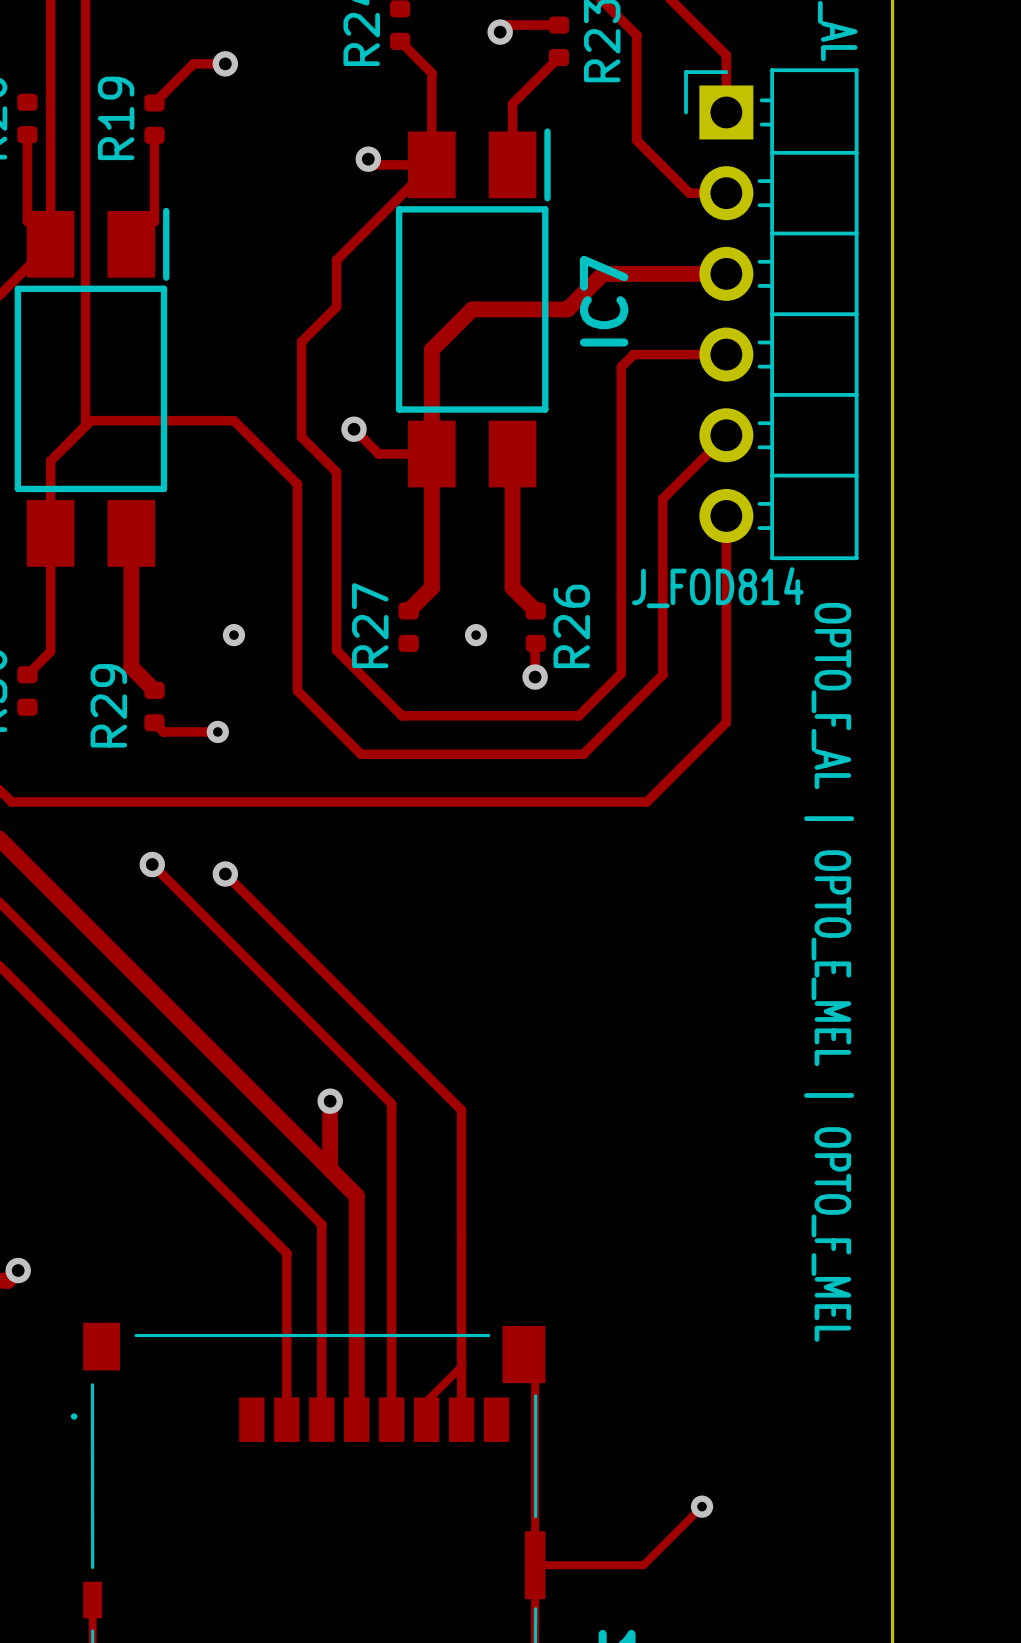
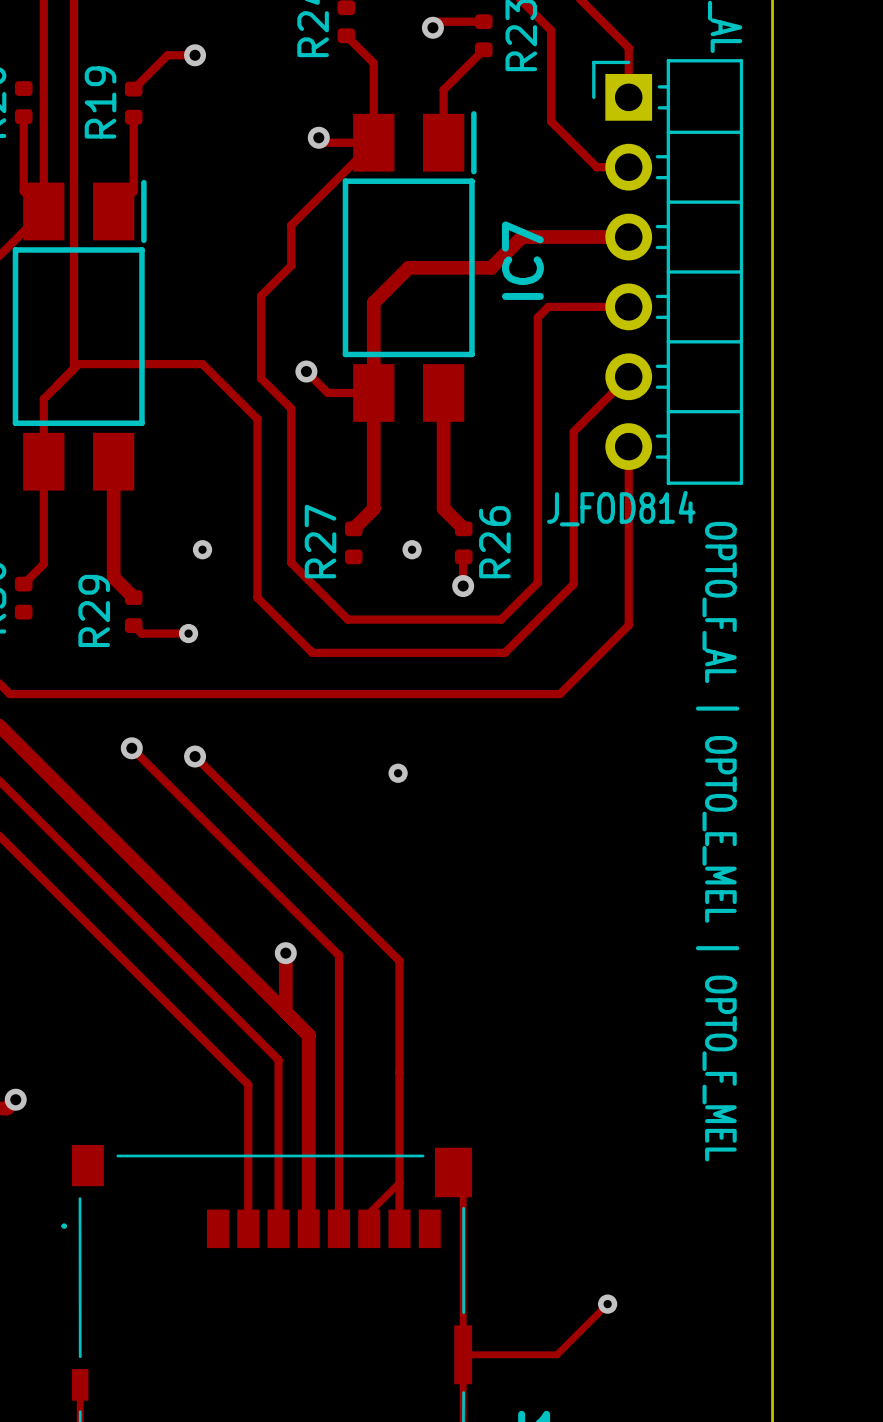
via: none -> (398, 773)

